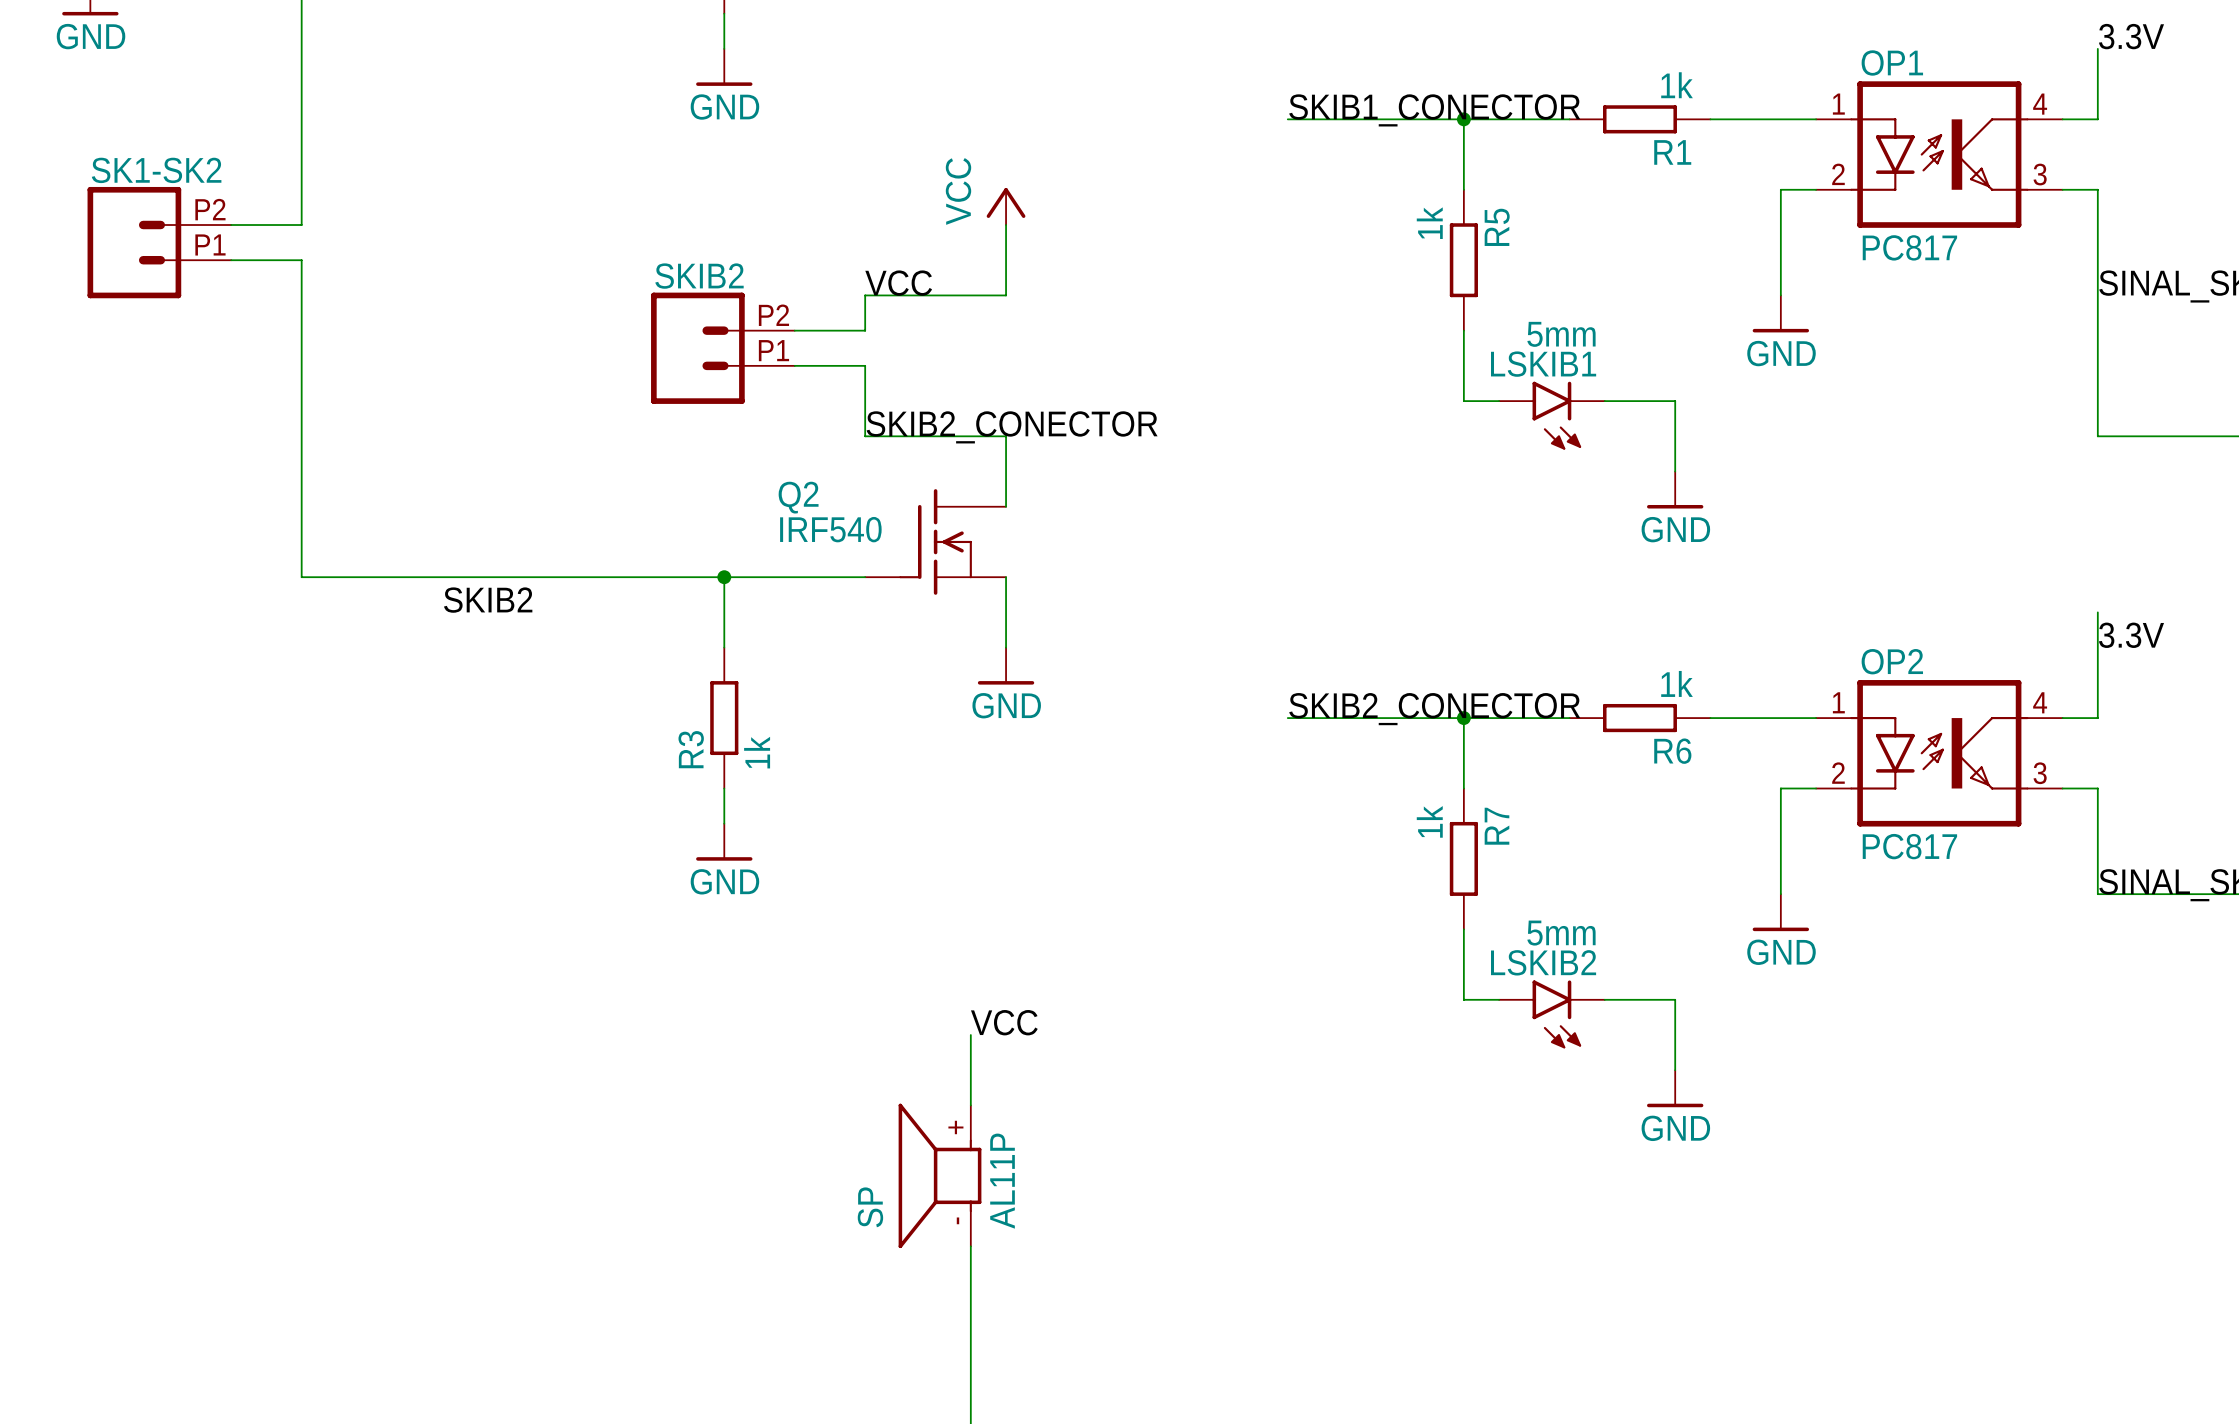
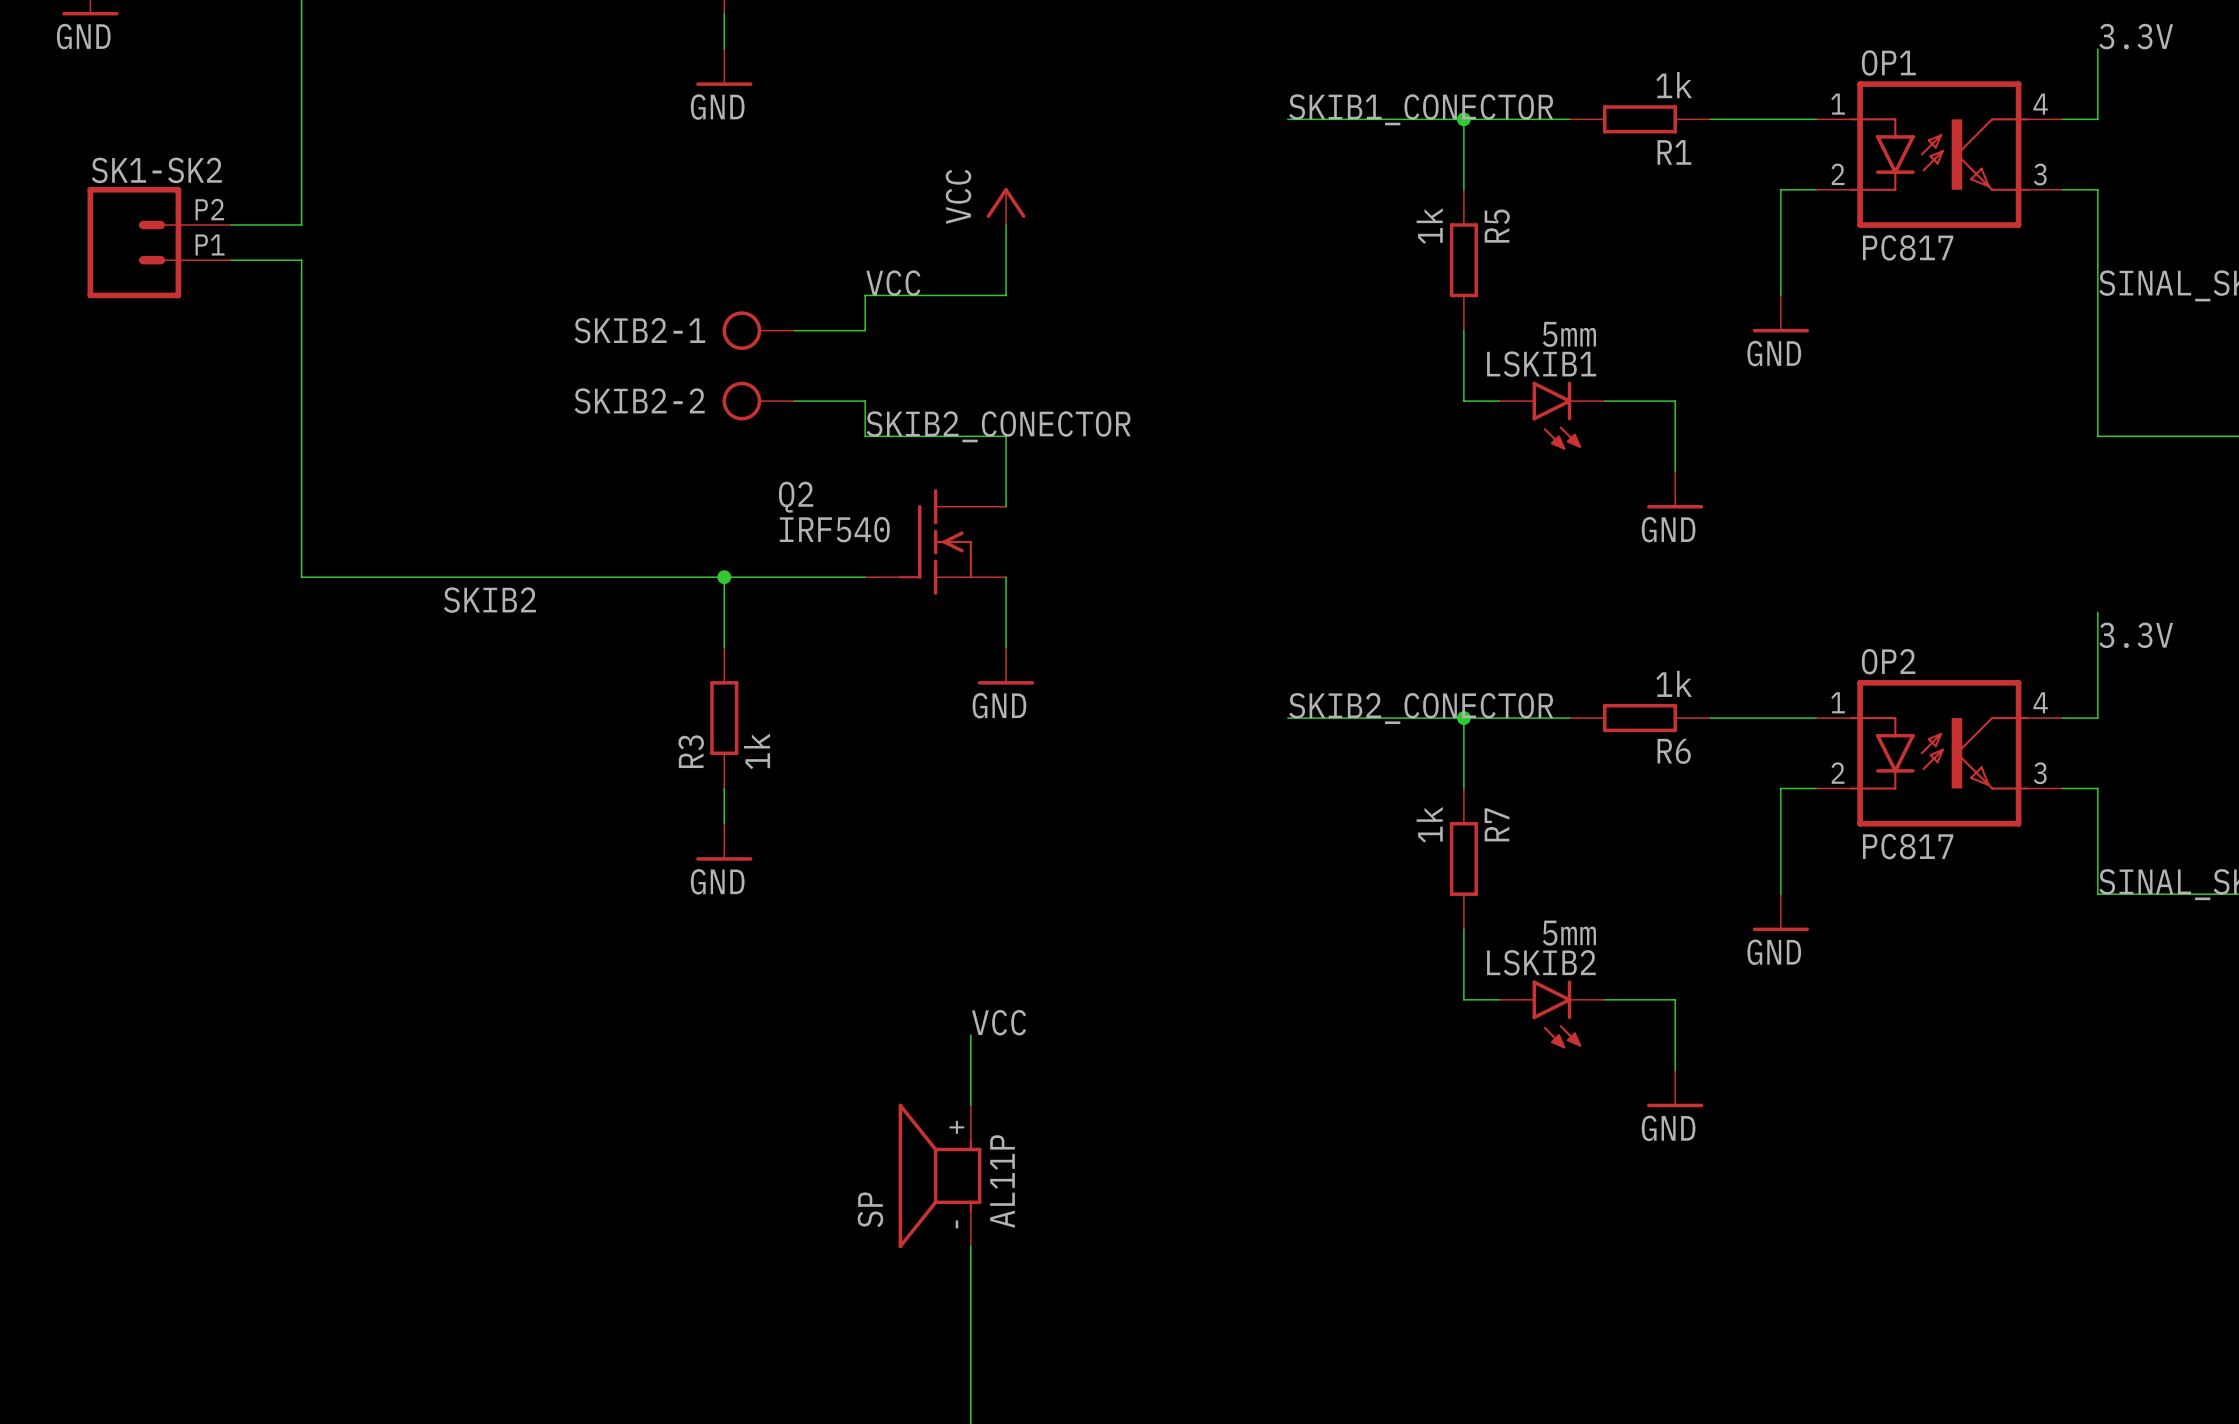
SKIB2-1: none -> (758, 330)
SKIB2: (722, 348) -> none
wire: (794, 365) (865, 365) (865, 401) -> (794, 401) (865, 401)
SKIB2-2: none -> (758, 401)

